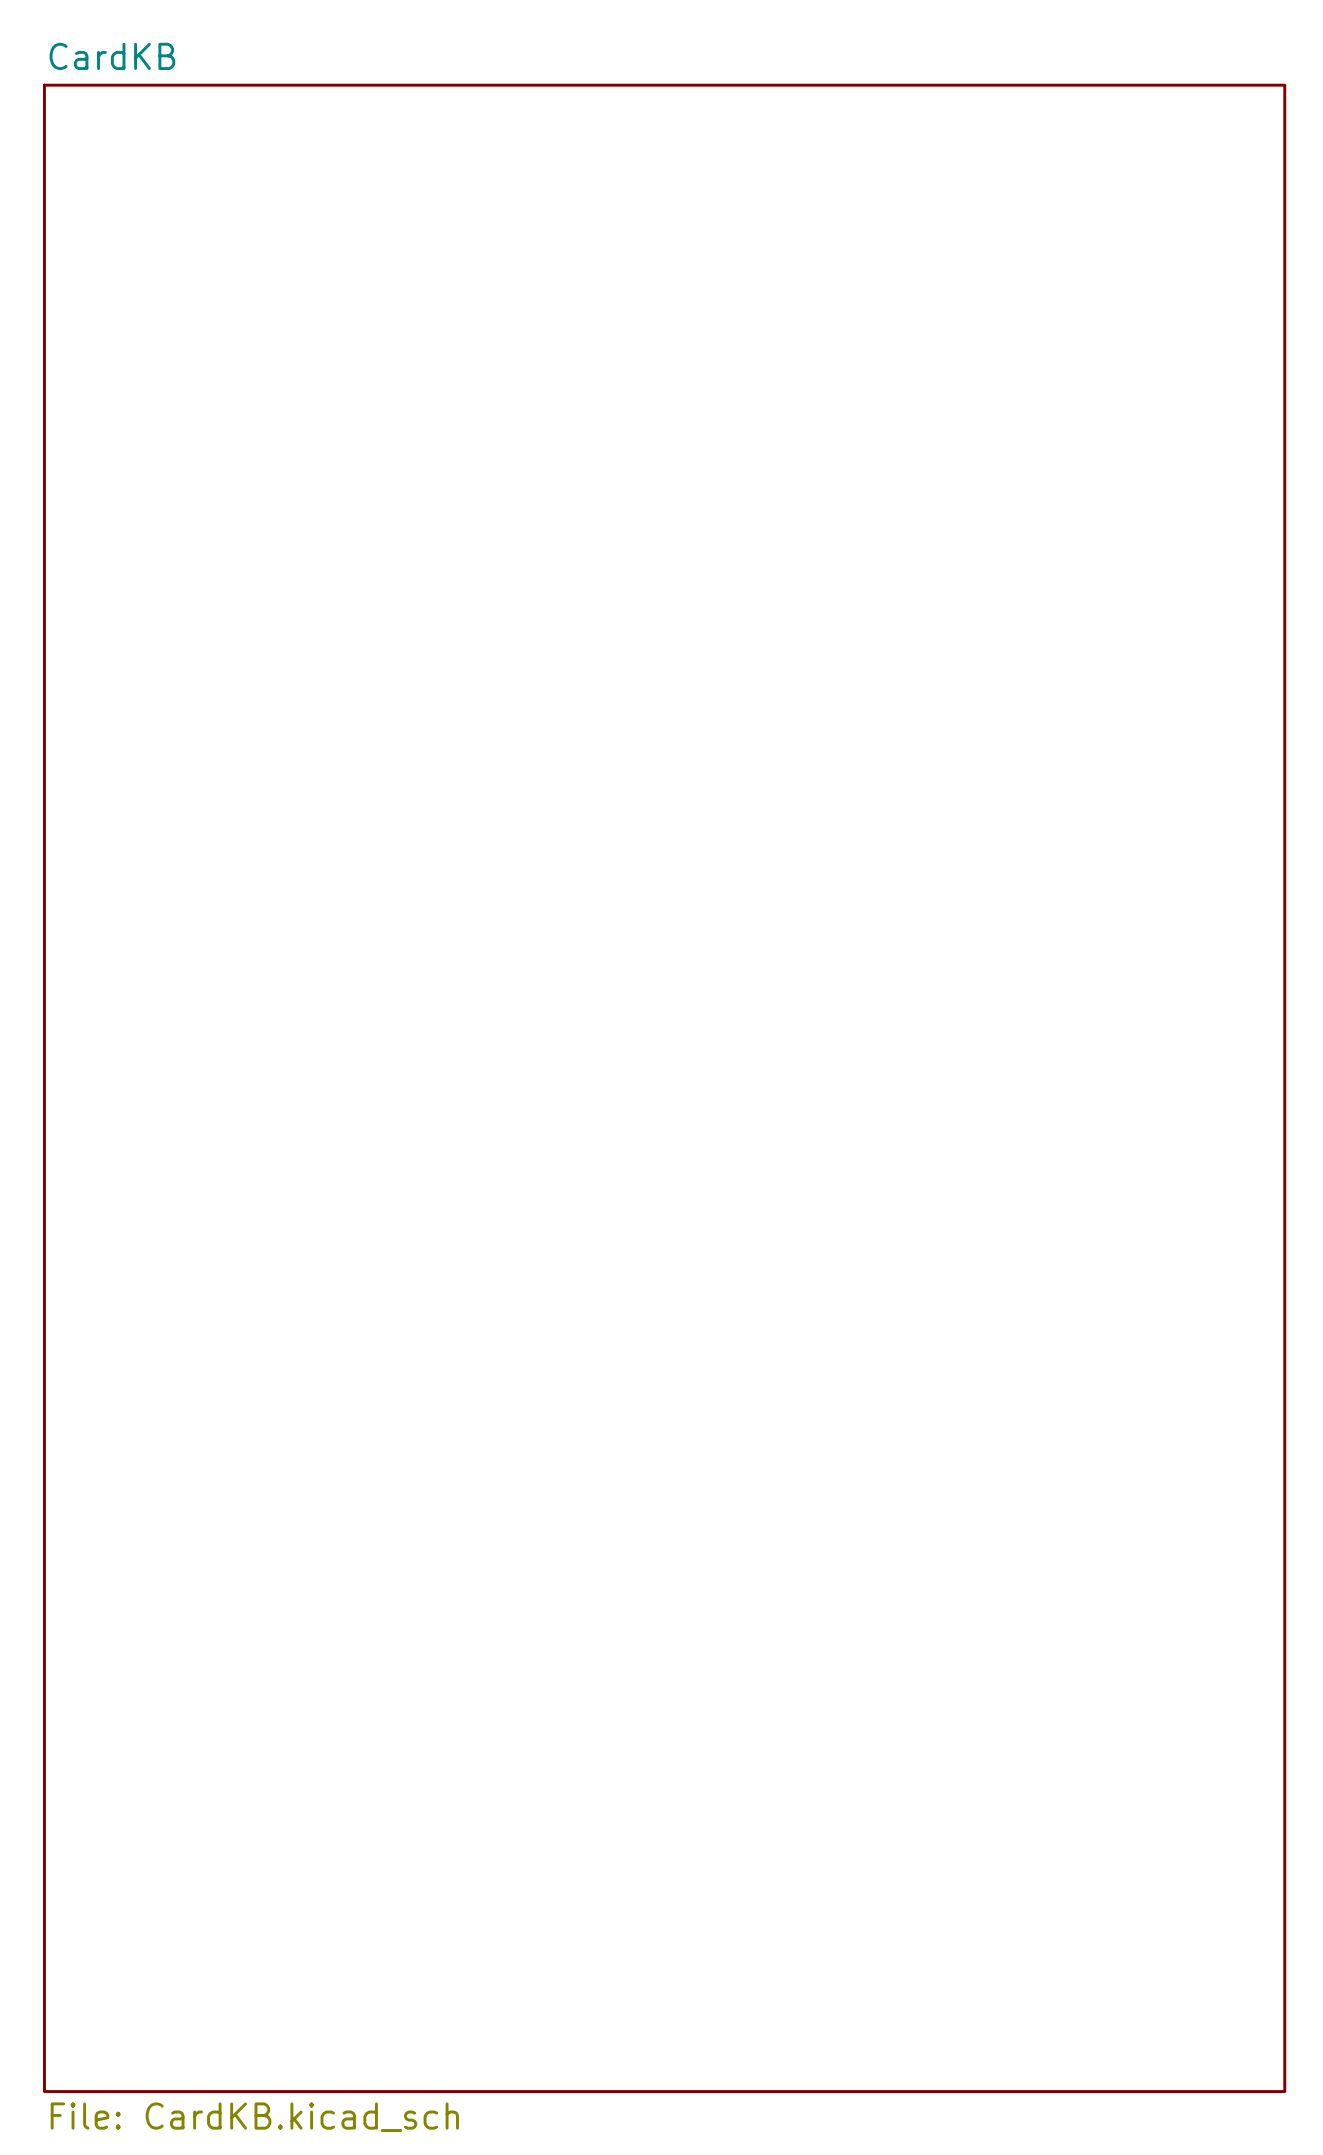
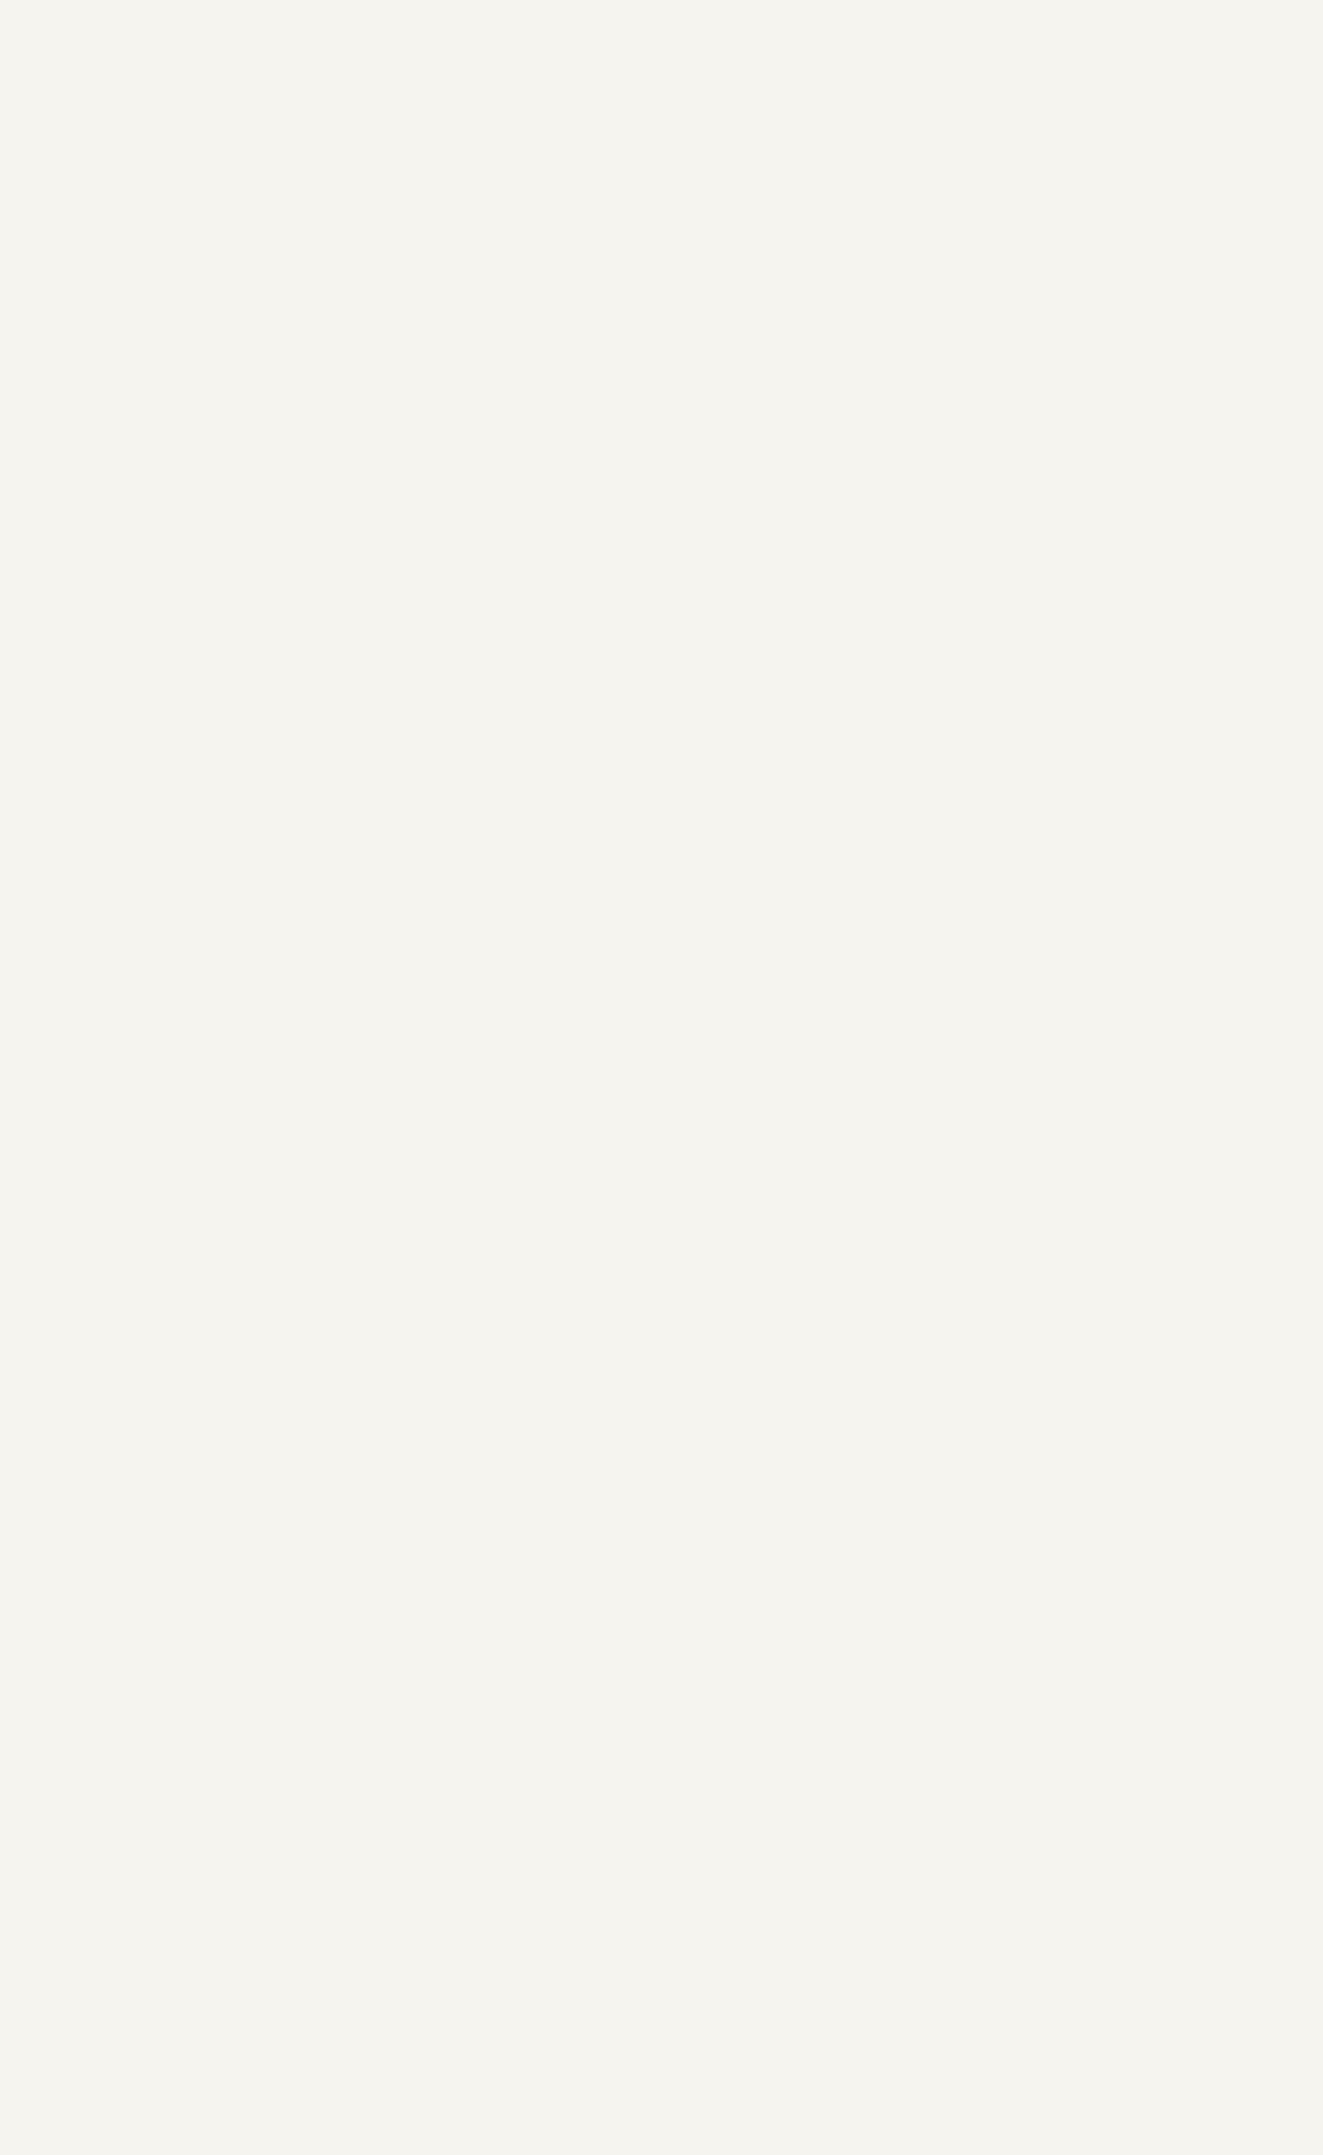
sheet CardKB: File: CardKB.kicad_sch (664, 1088) -> none

